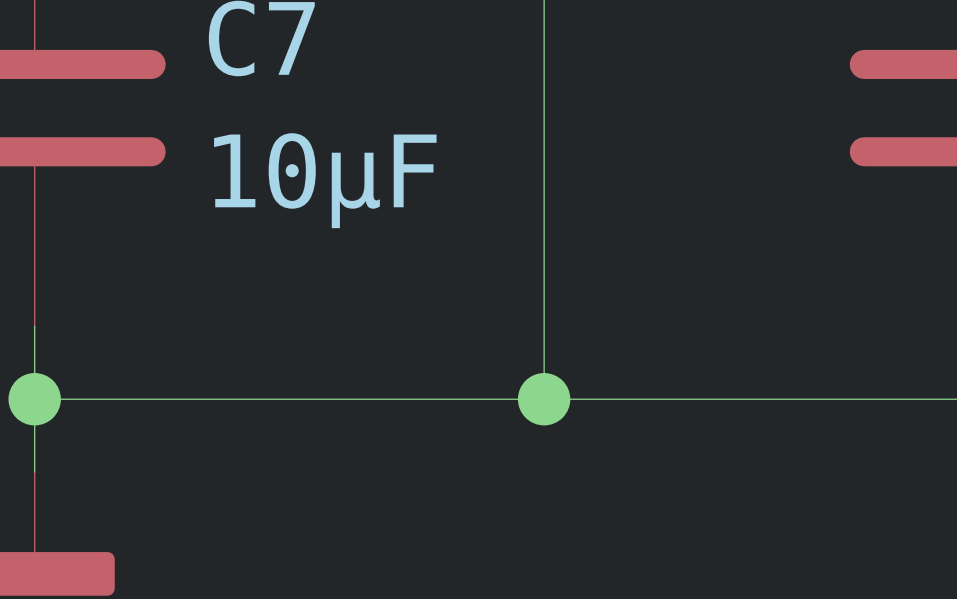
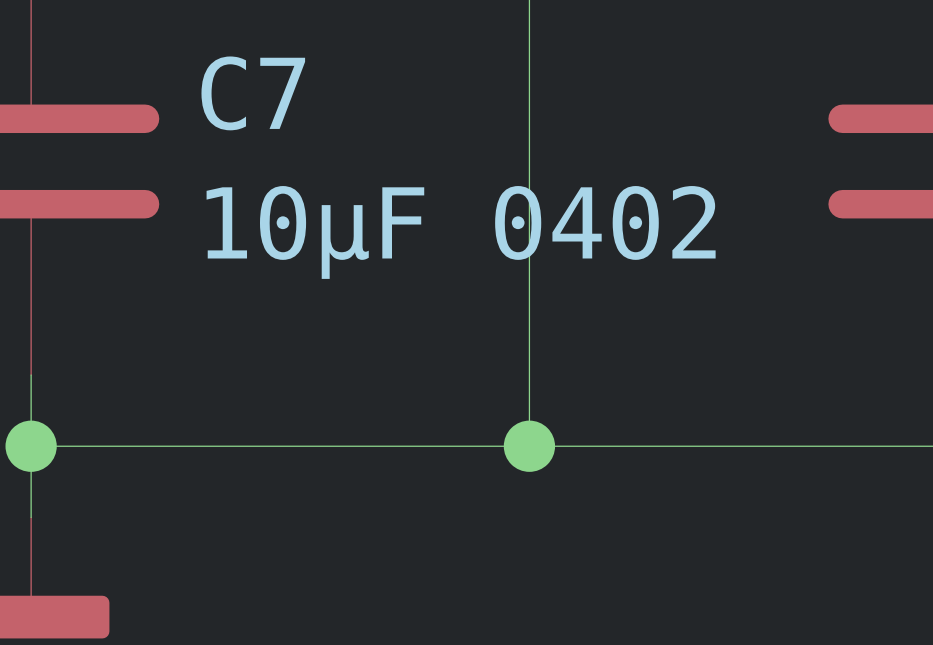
C7 value: 10µF (325, 180) -> 10µF 0402 (461, 232)

